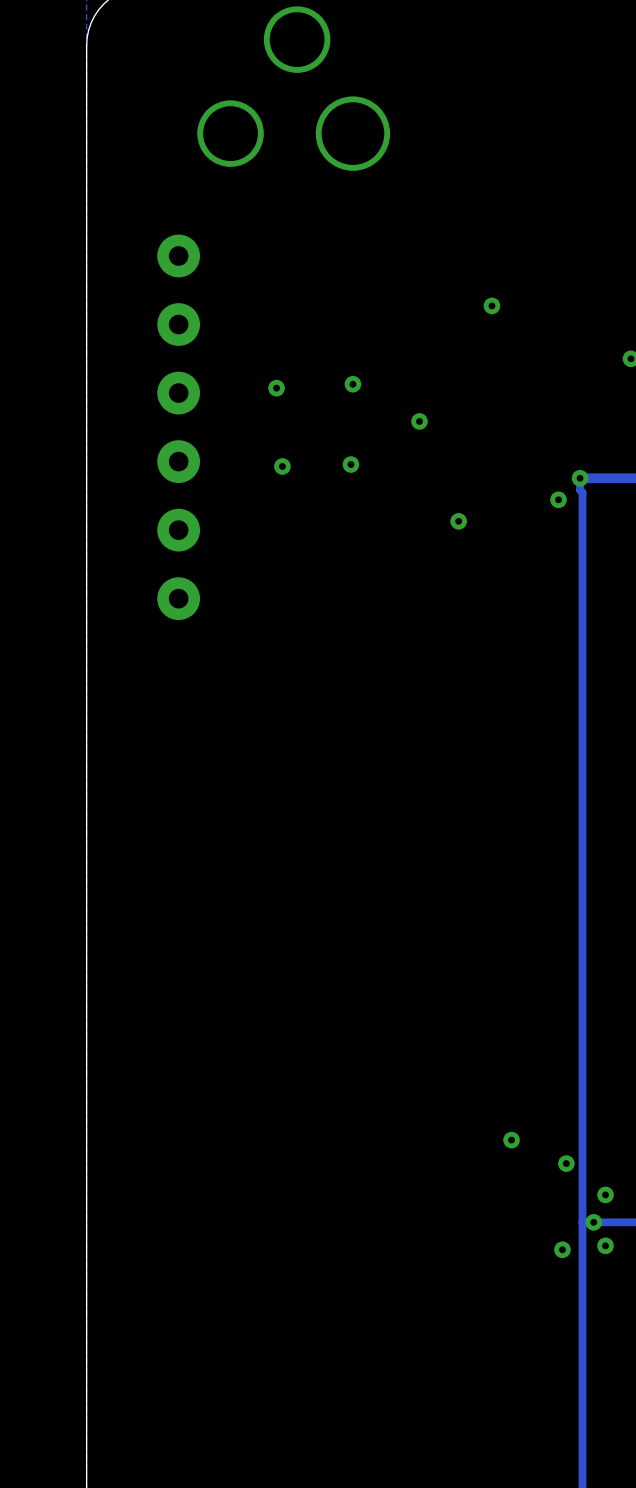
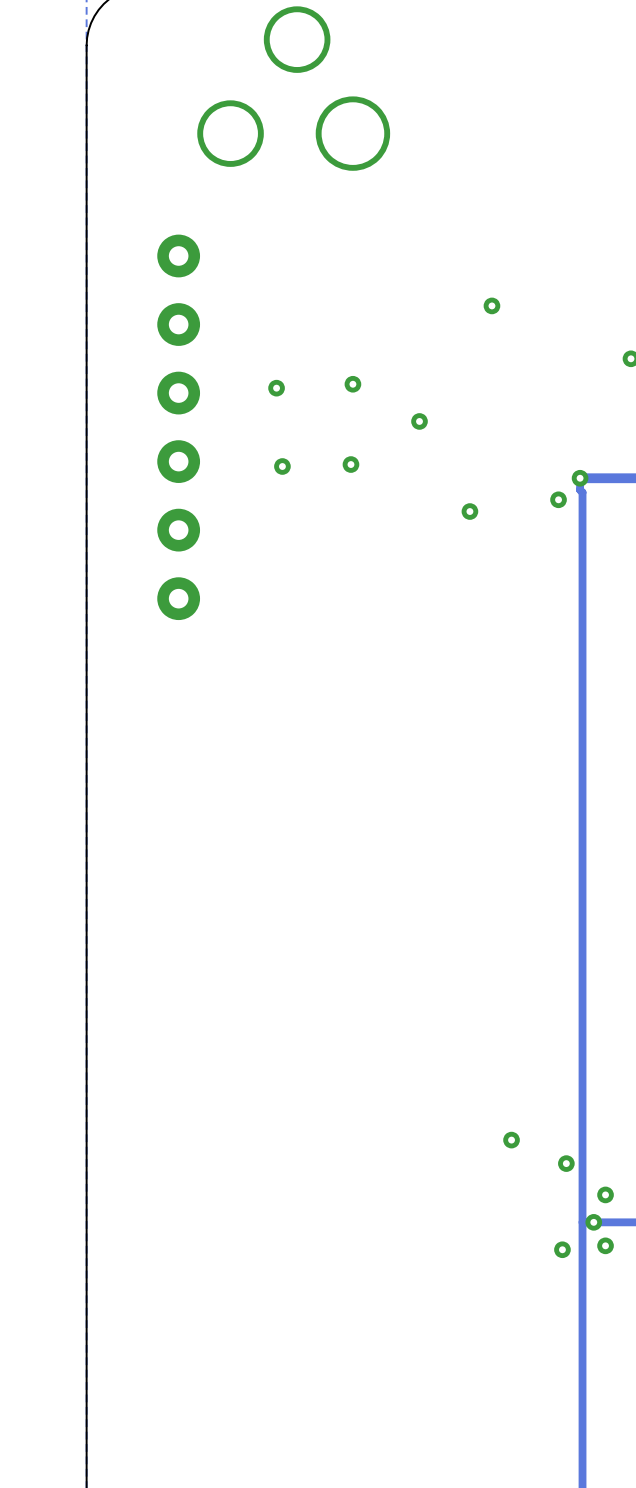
via position: (458, 521) -> (469, 511)

